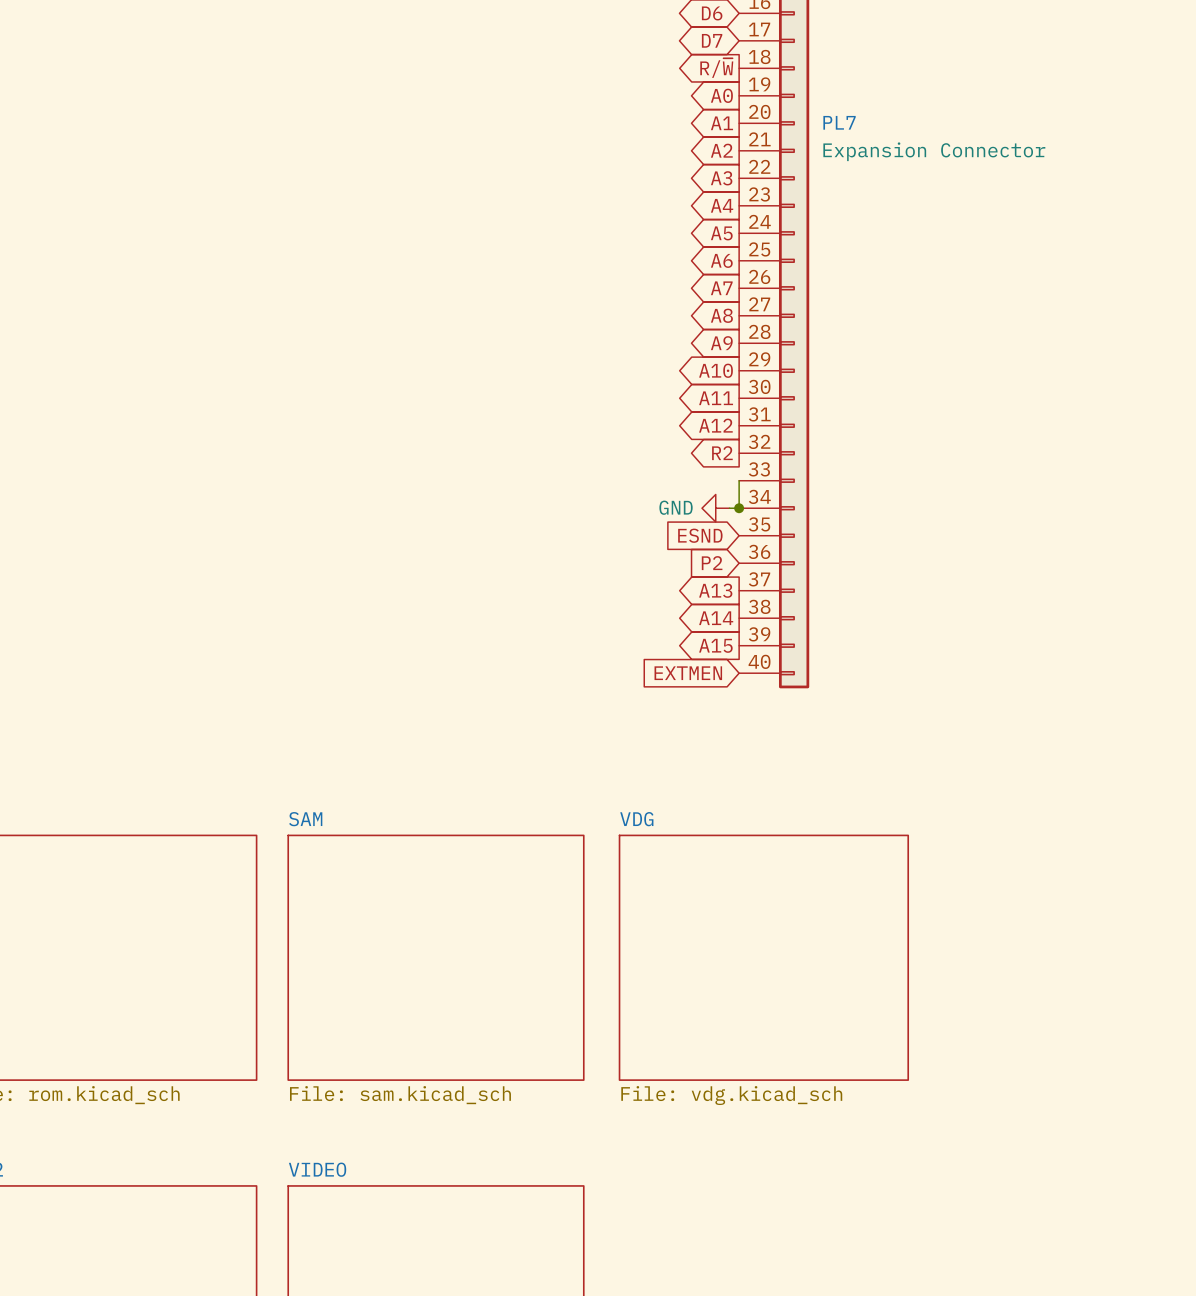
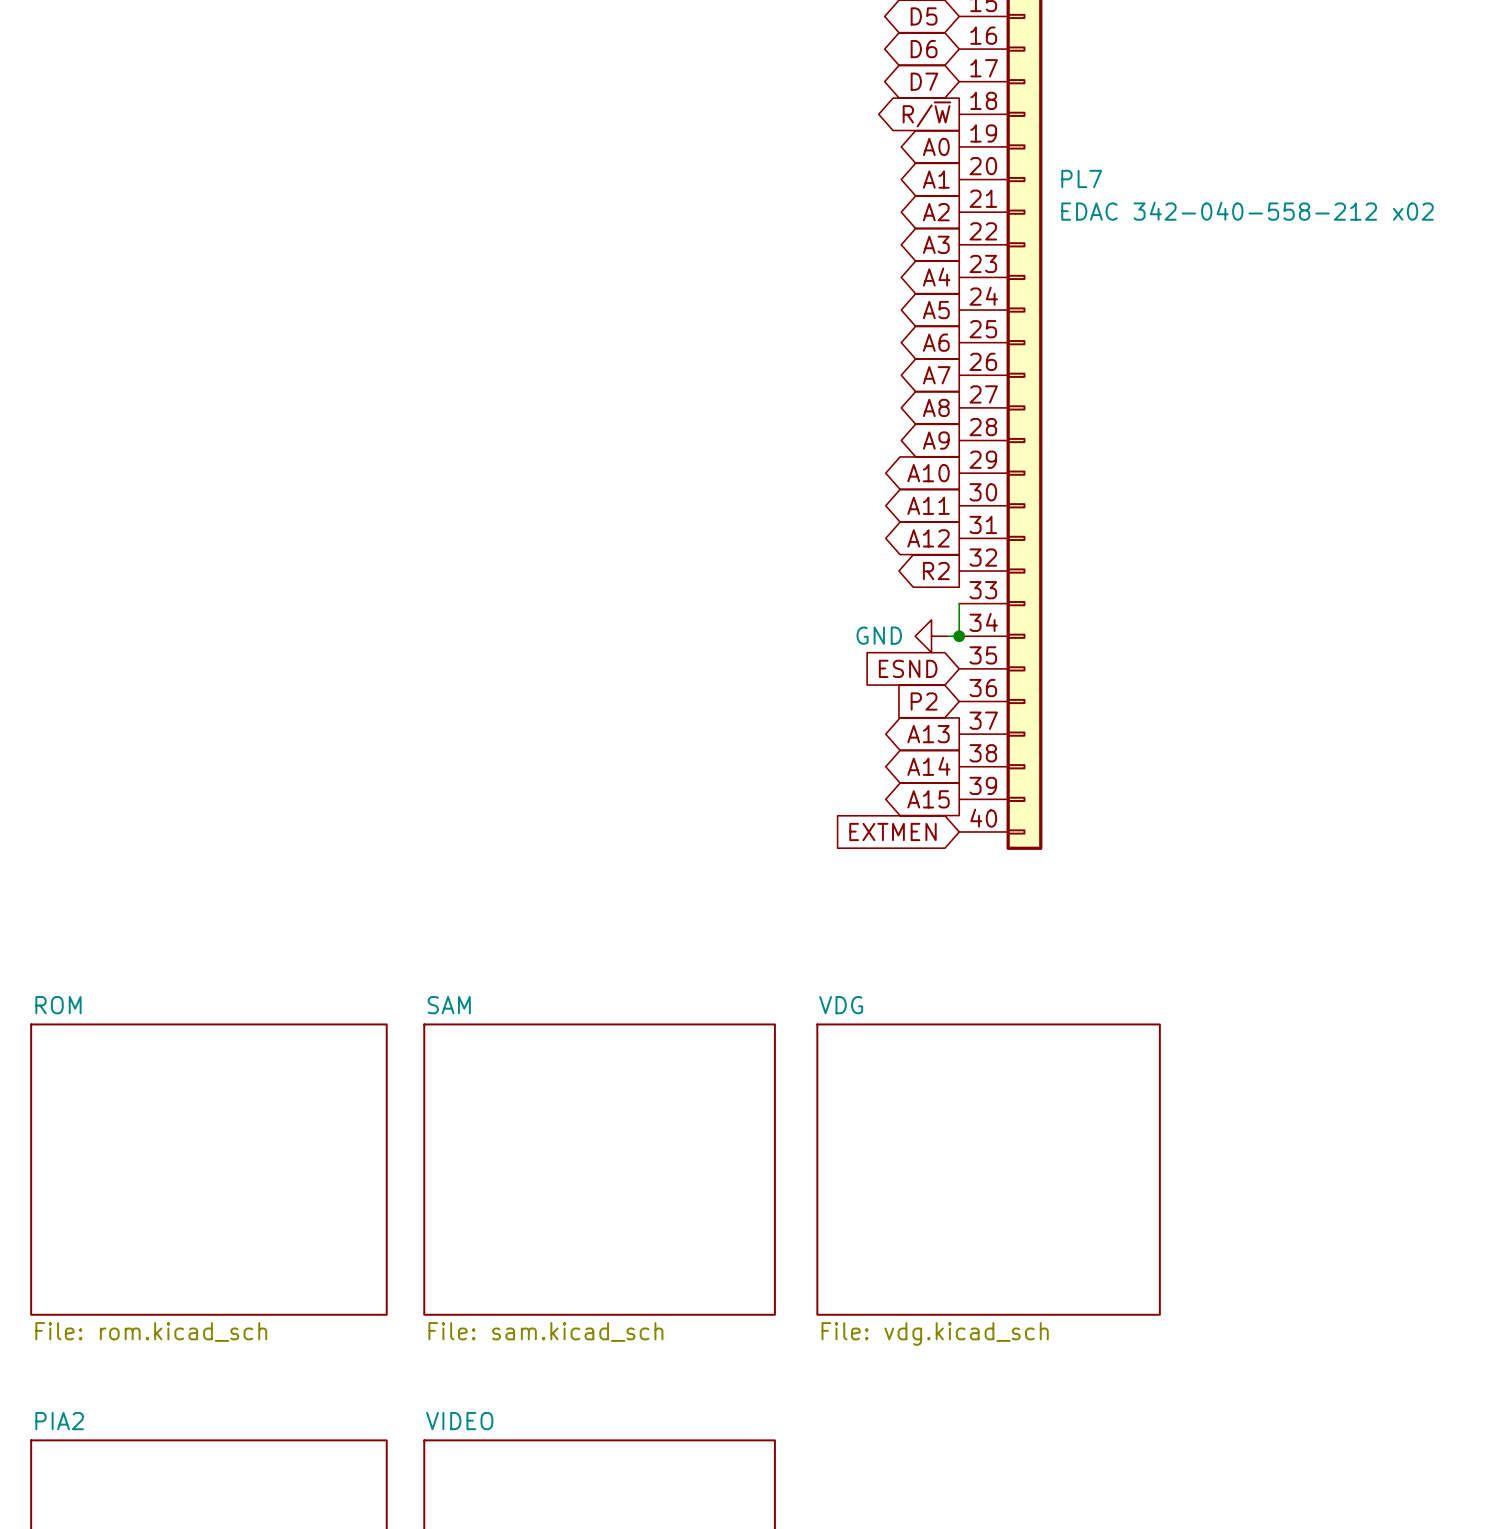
PL7 value: Expansion Connector (934, 151) -> EDAC 342-040-558-212 x02 (1247, 211)

